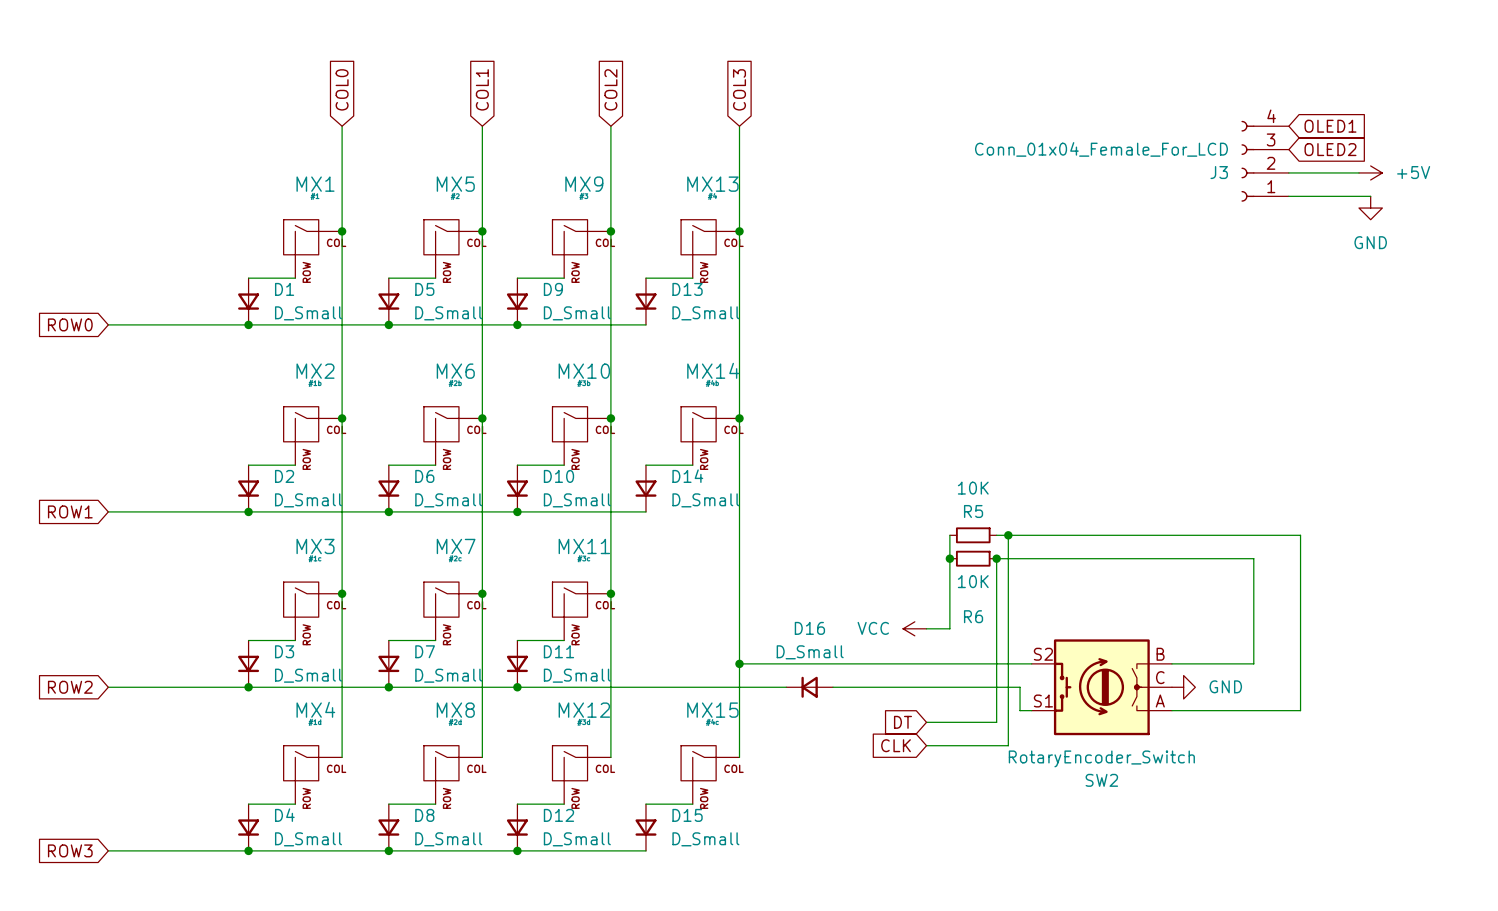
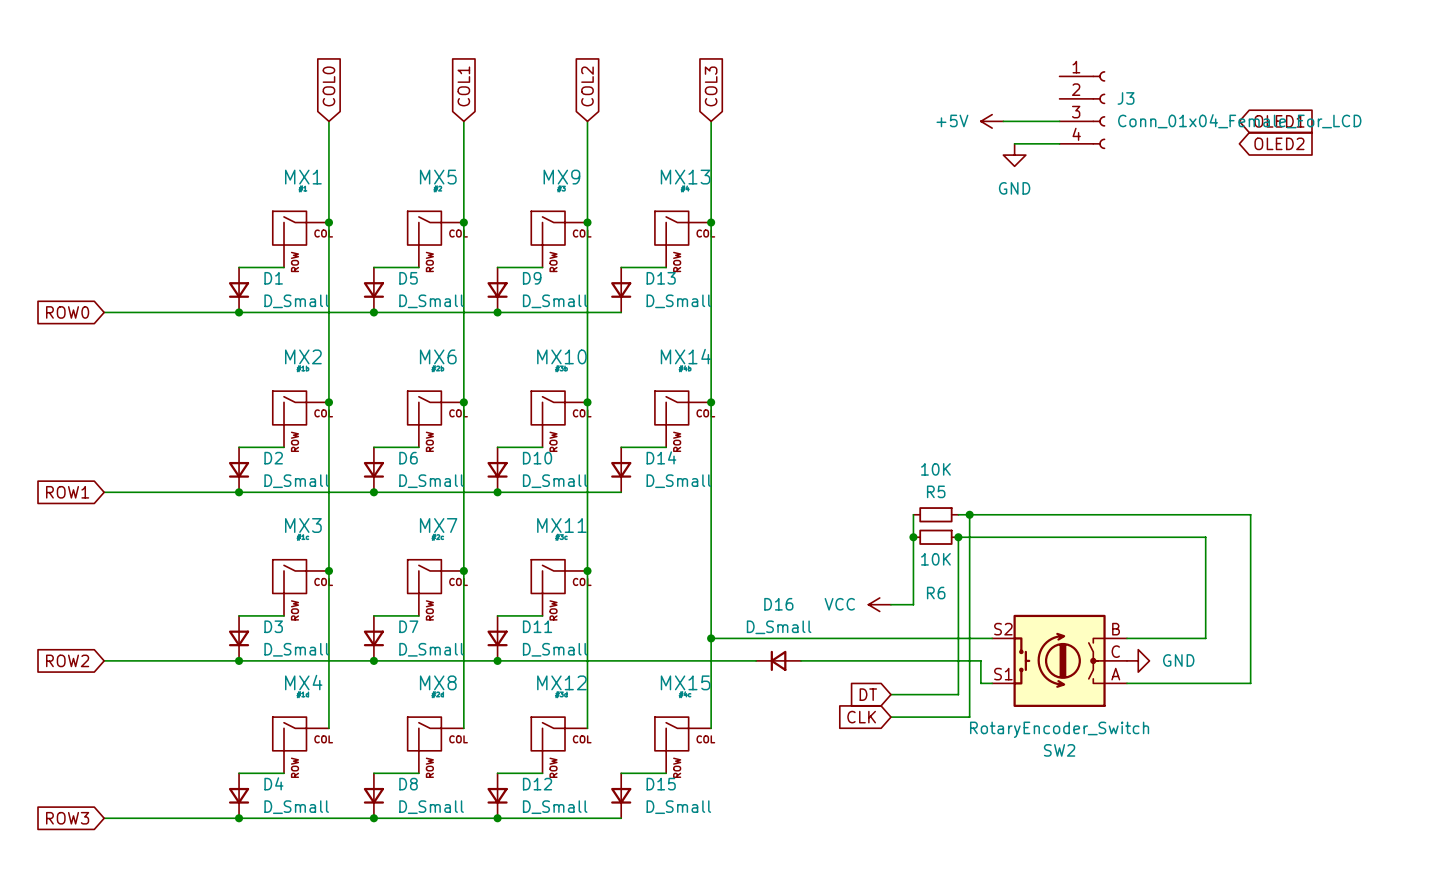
power symbol: none -> +5V (992, 121)
wire: none -> (1003, 121) (1059, 121)
wire: none -> (1014, 143) (1059, 143)
power symbol: none -> GND (1014, 155)
J3 rotation: 0° (1247, 161) -> 180° (1098, 110)
J3 position: (1265, 161) -> (1082, 110)
wire: (1288, 172) (1358, 172) -> none
power symbol: +5V (1370, 172) -> none
wire: (1288, 196) (1370, 196) -> none
power symbol: GND (1370, 208) -> none

